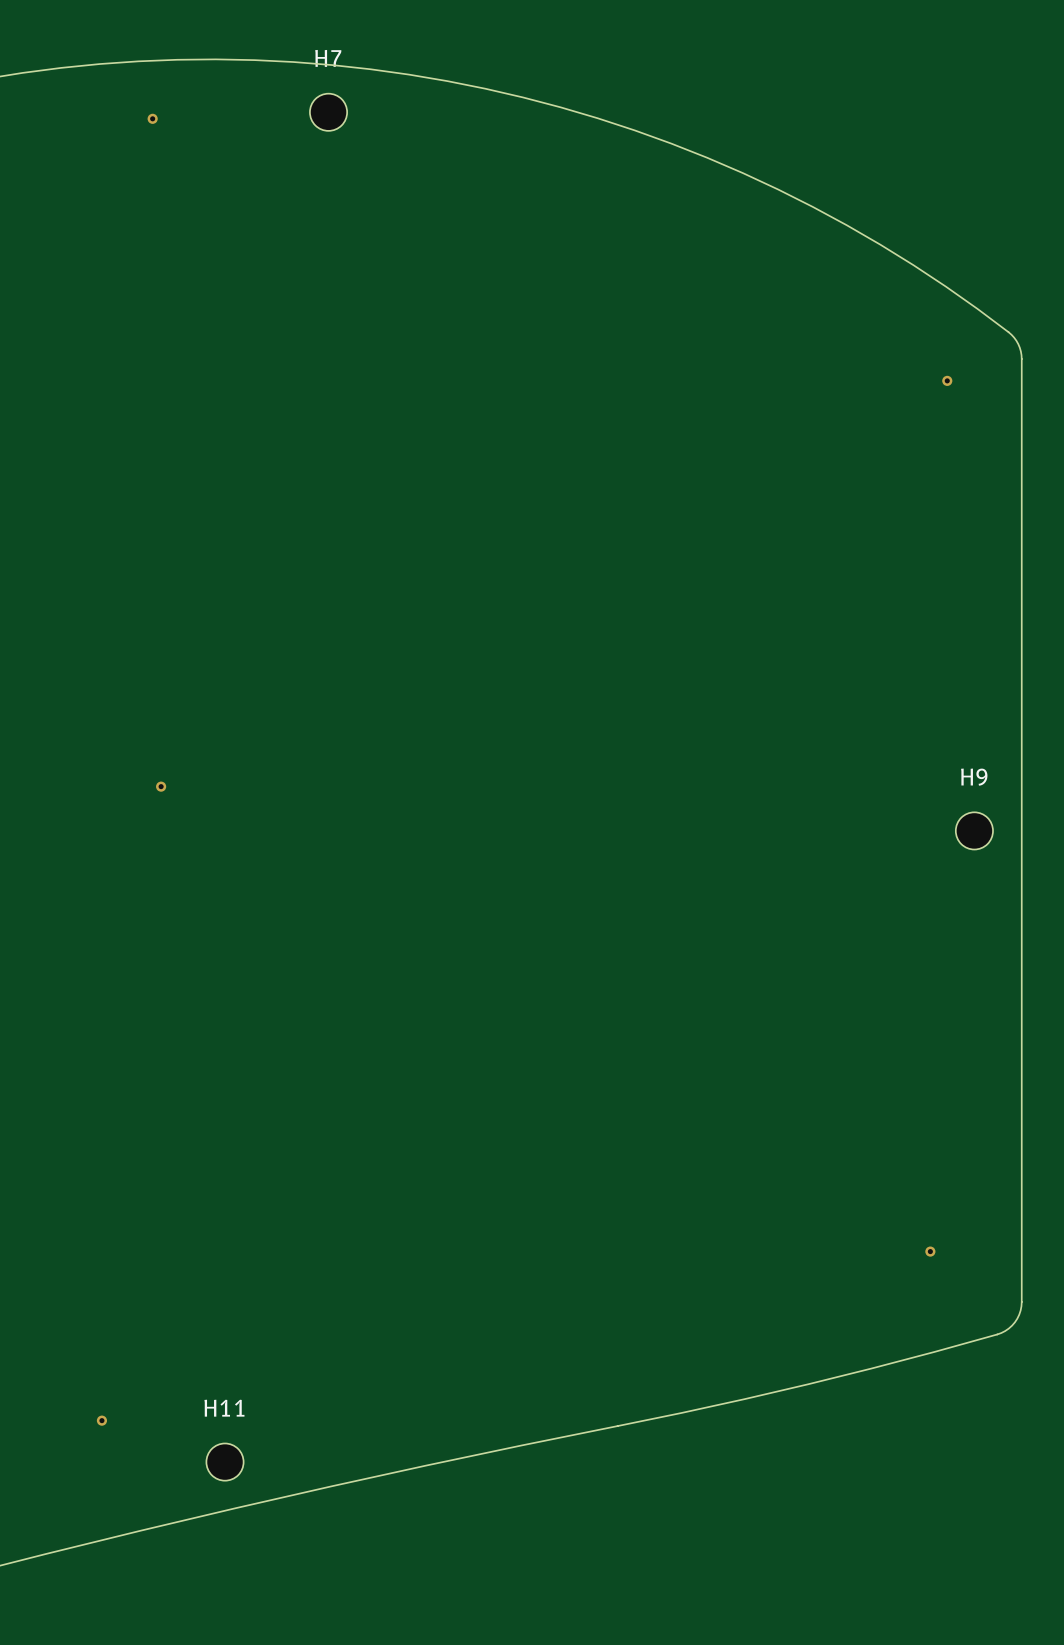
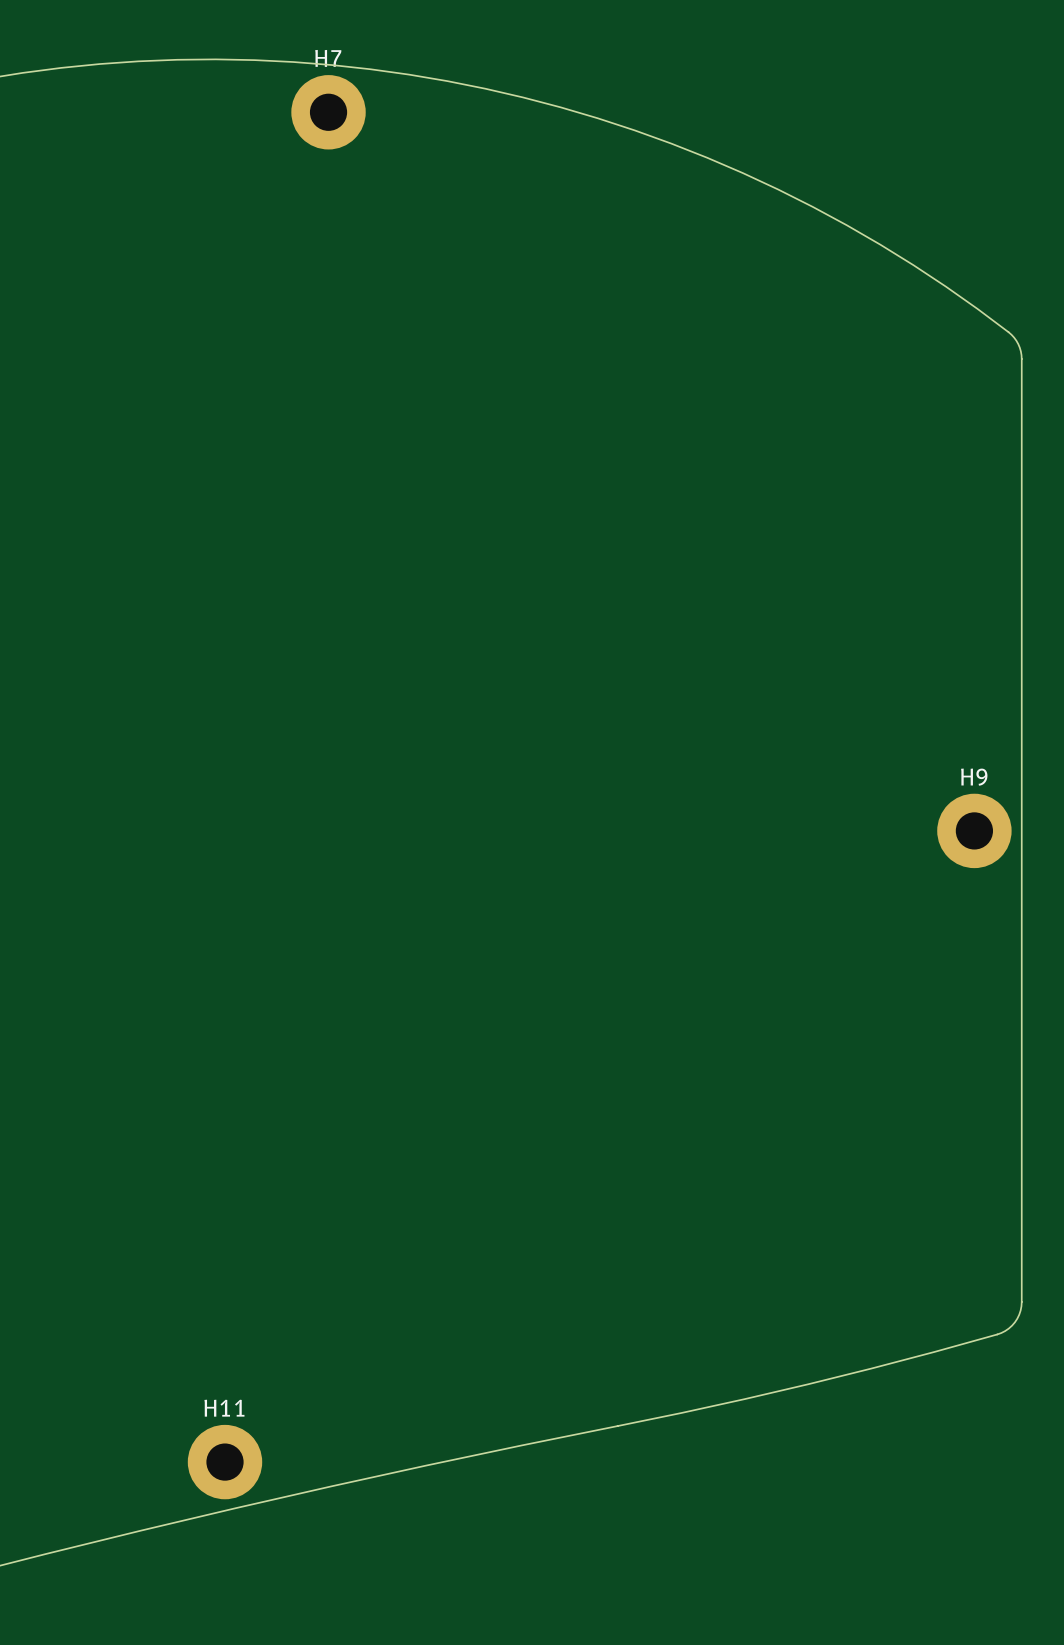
H7 footprint: [309, 93, 348, 131] -> [291, 75, 366, 150]
via: (152, 118) -> none
via: (947, 380) -> none
via: (161, 786) -> none
H9 footprint: [955, 812, 994, 850] -> [937, 793, 1012, 869]
via: (930, 1251) -> none
via: (101, 1420) -> none
H11 footprint: [206, 1443, 244, 1481] -> [187, 1424, 263, 1500]

